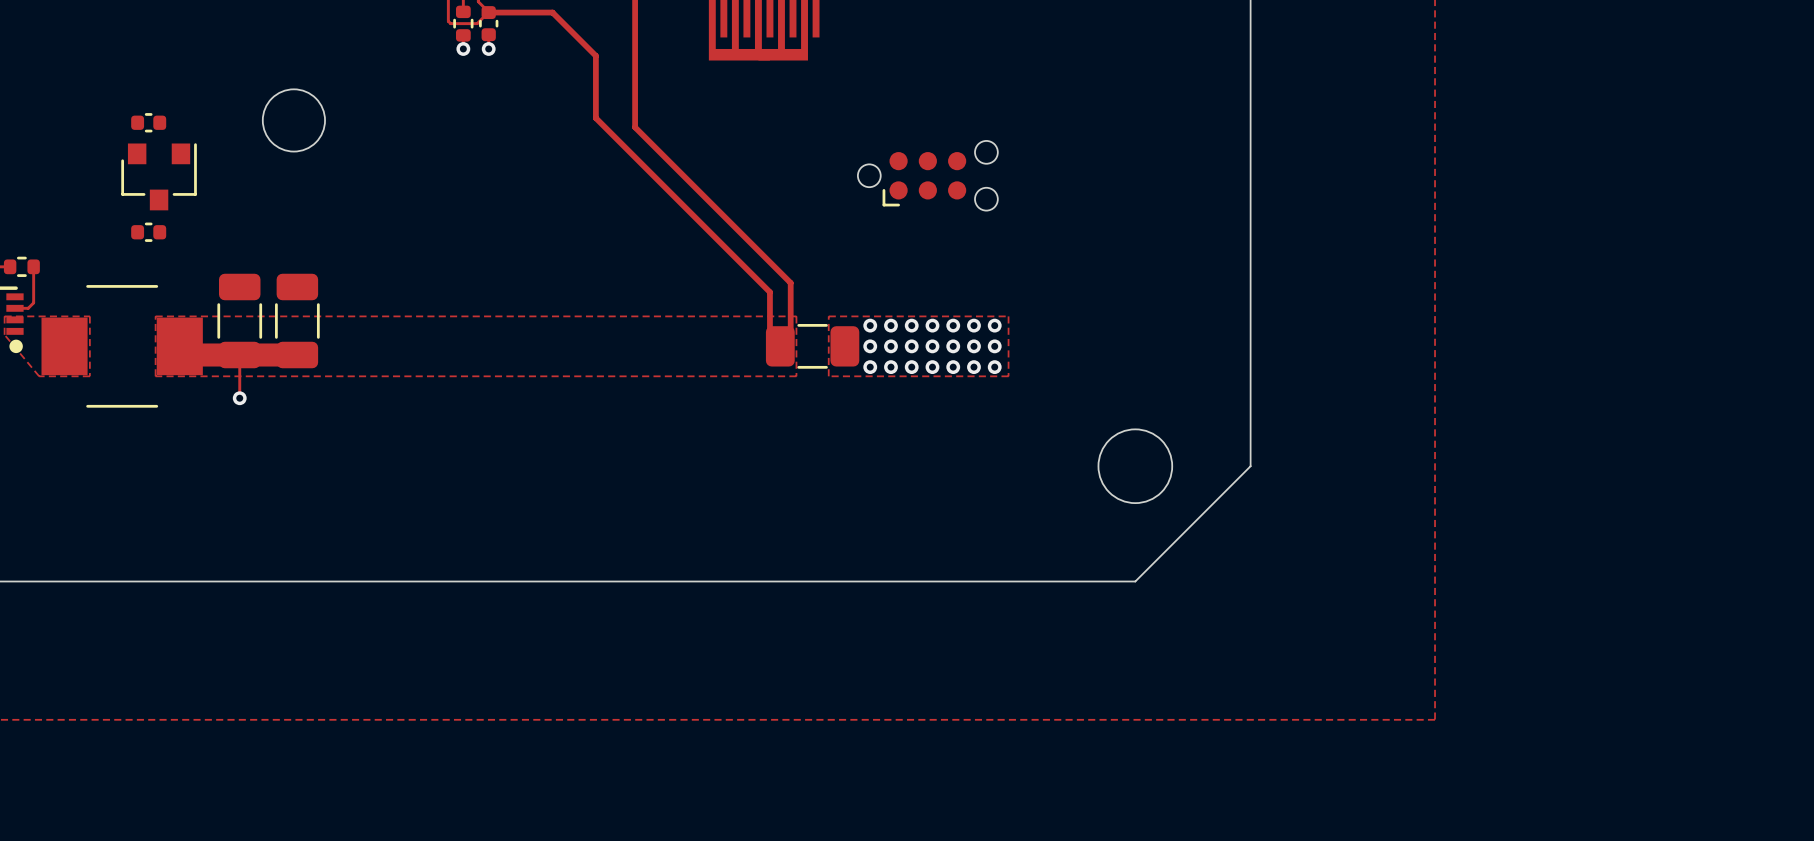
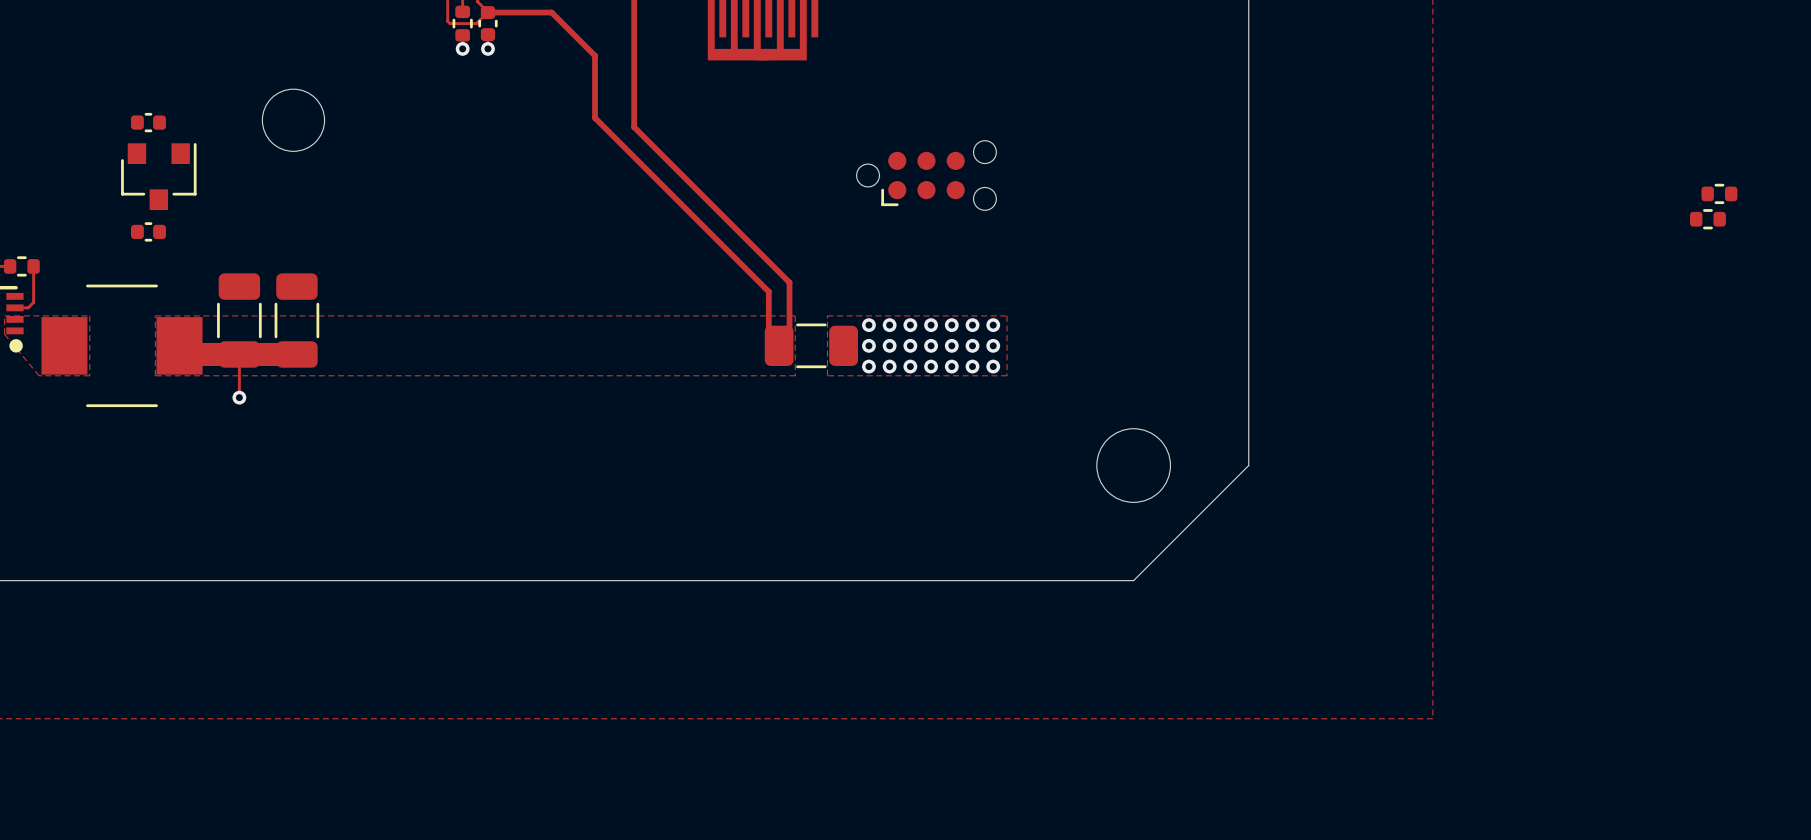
part: none -> (1719, 193)
part: none -> (1707, 219)

